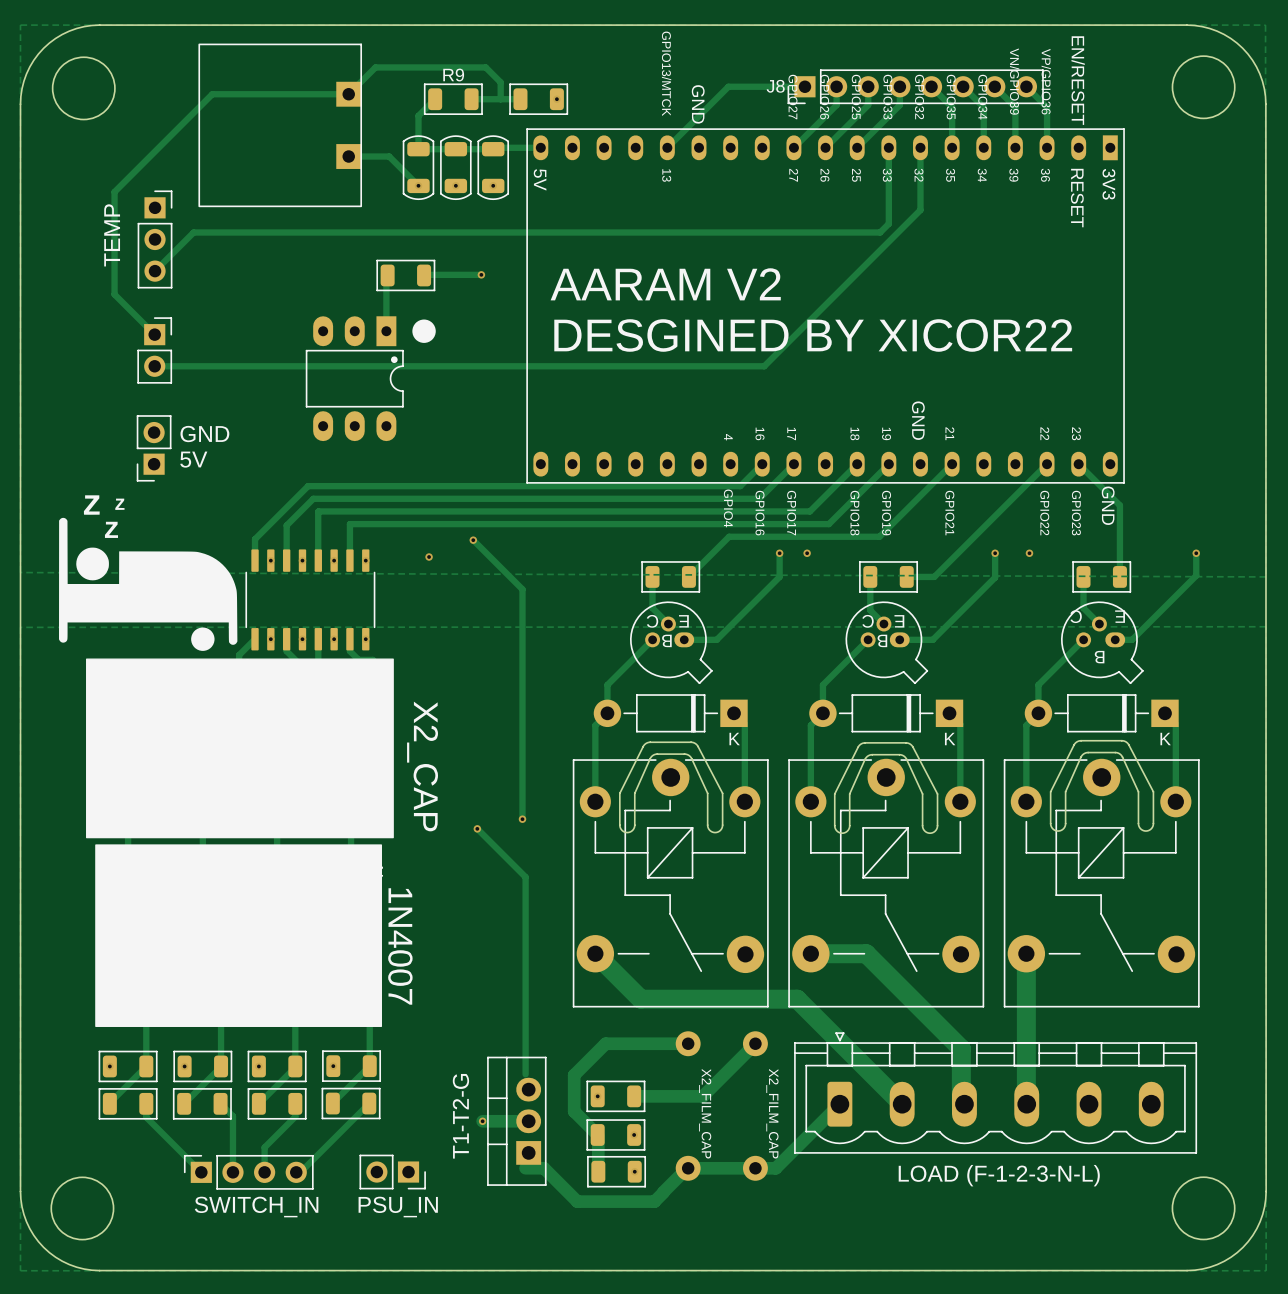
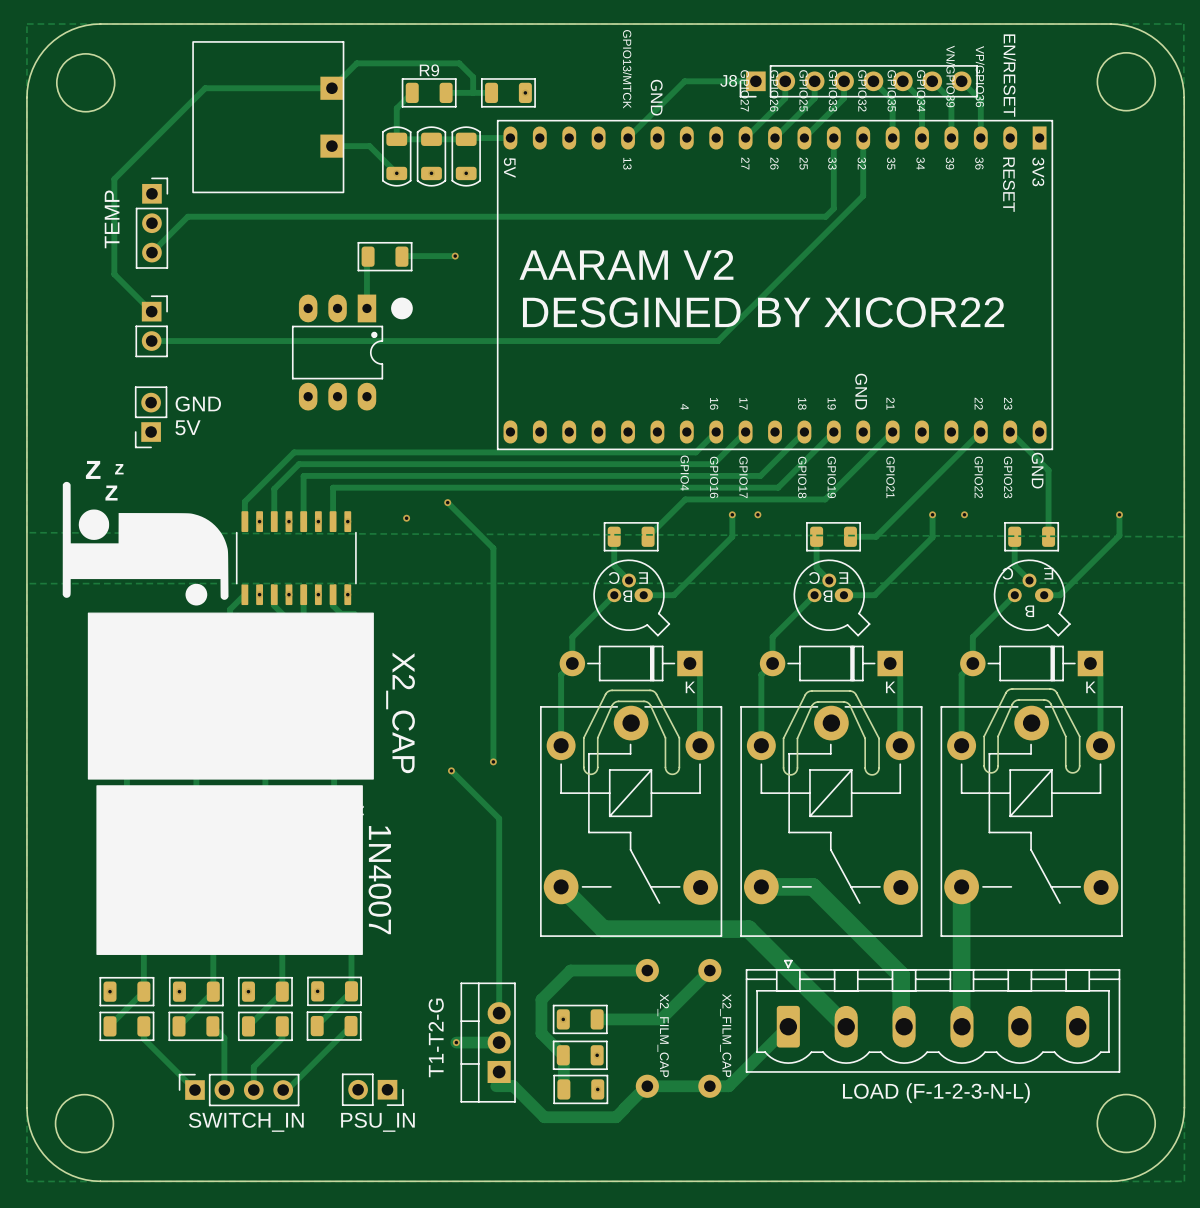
track: (525, 877) (525, 1074) -> (496, 815) (499, 818) (499, 1013)

